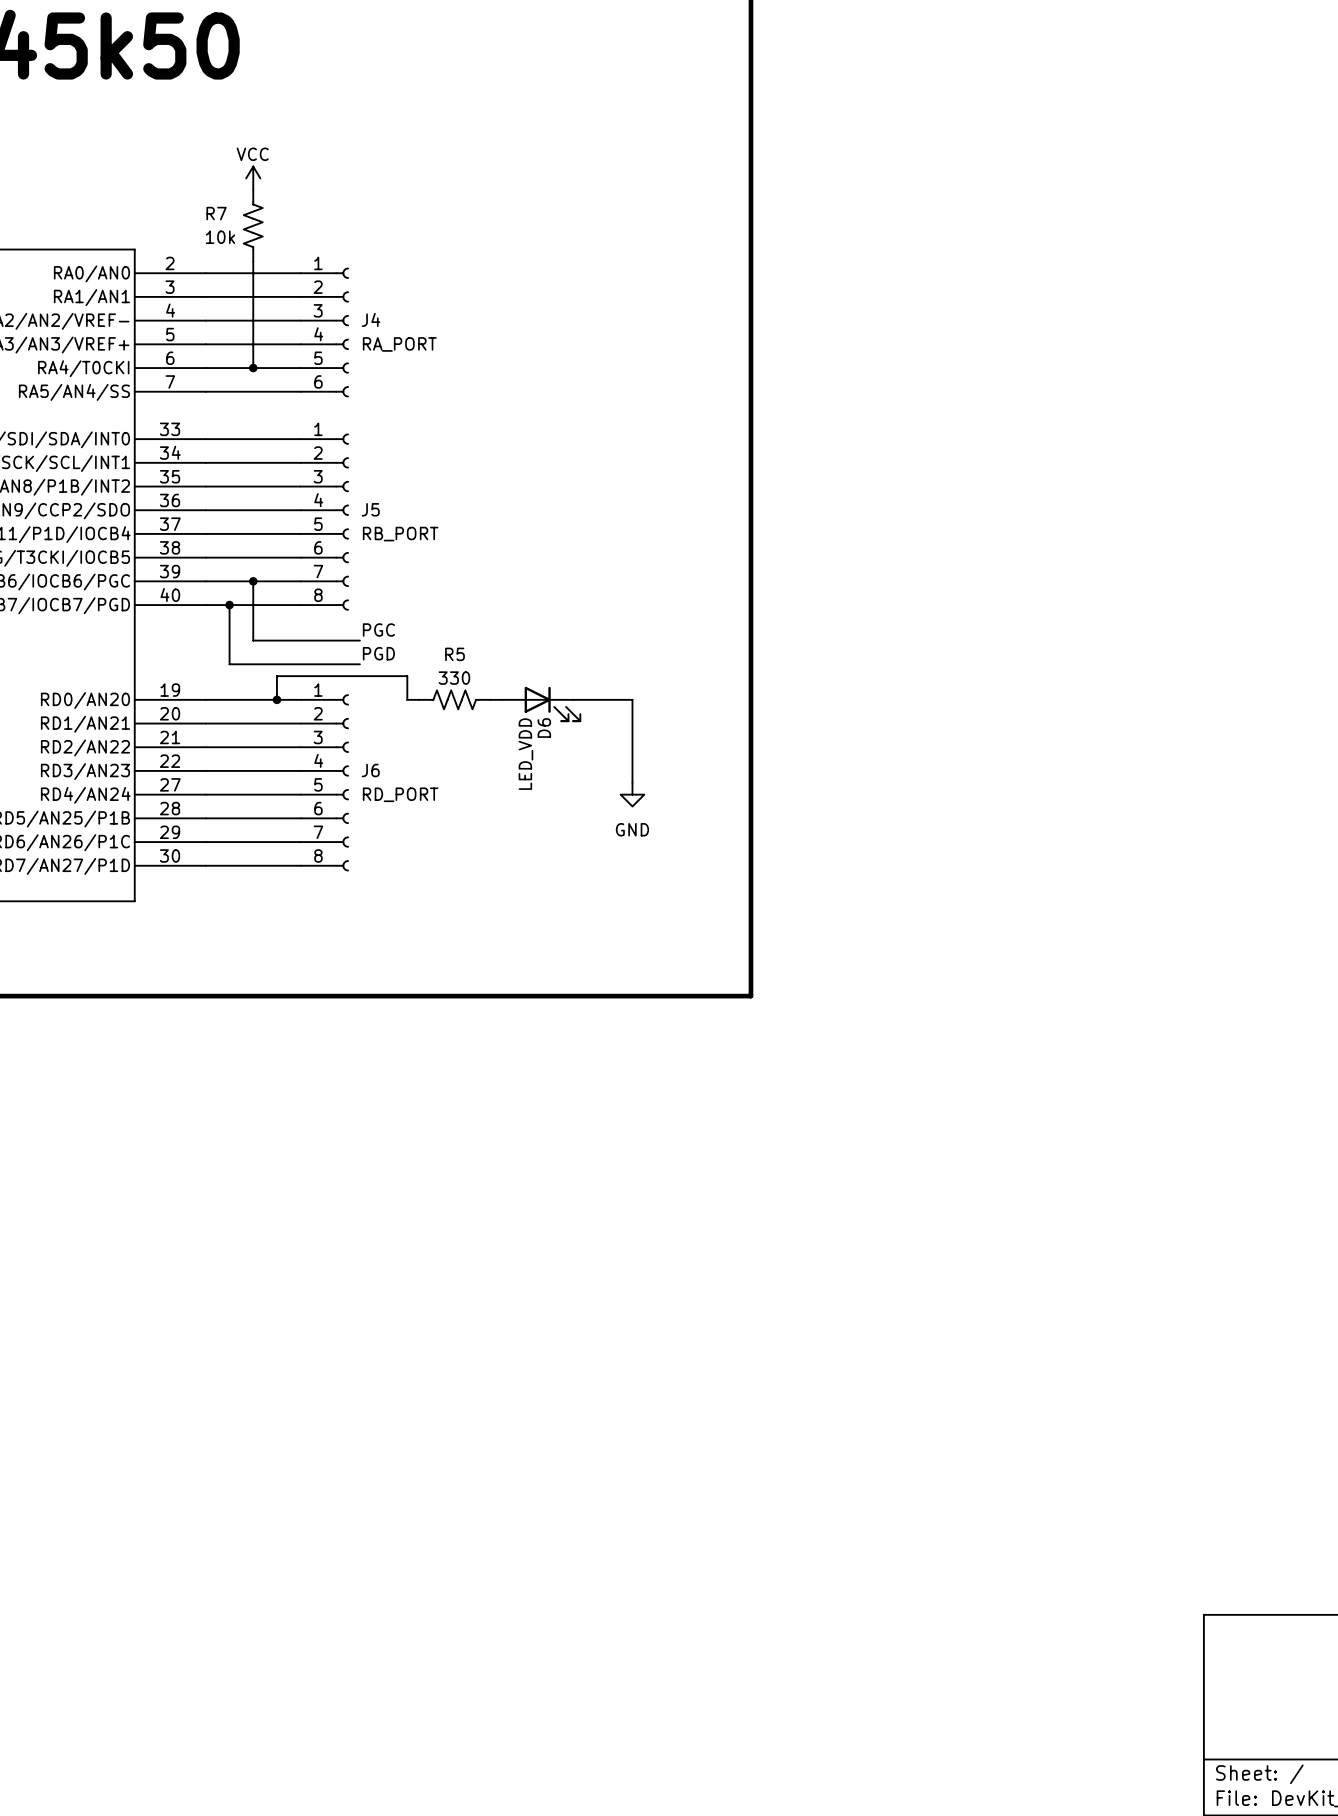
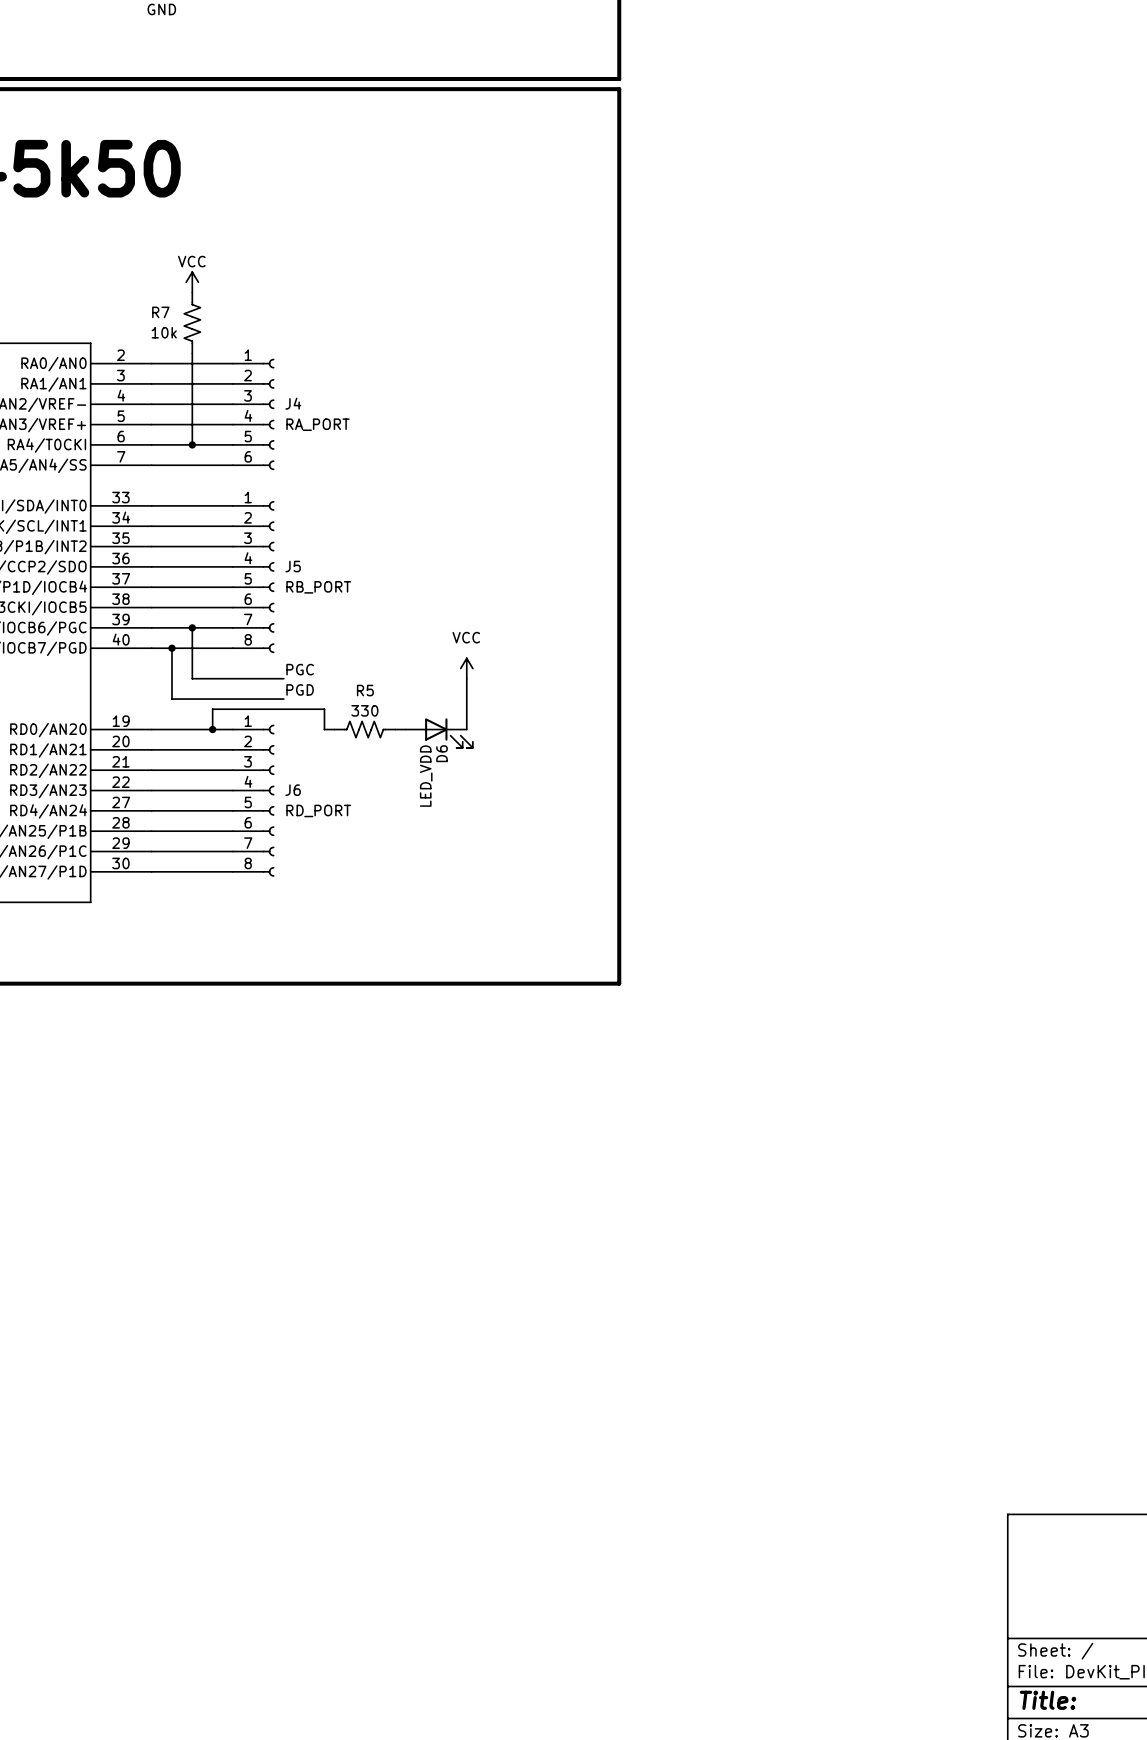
power symbol: none -> VCC (466, 668)
wire: (573, 699) (632, 699) (632, 782) -> (466, 729) (466, 678)
power symbol: GND (632, 794) -> none

